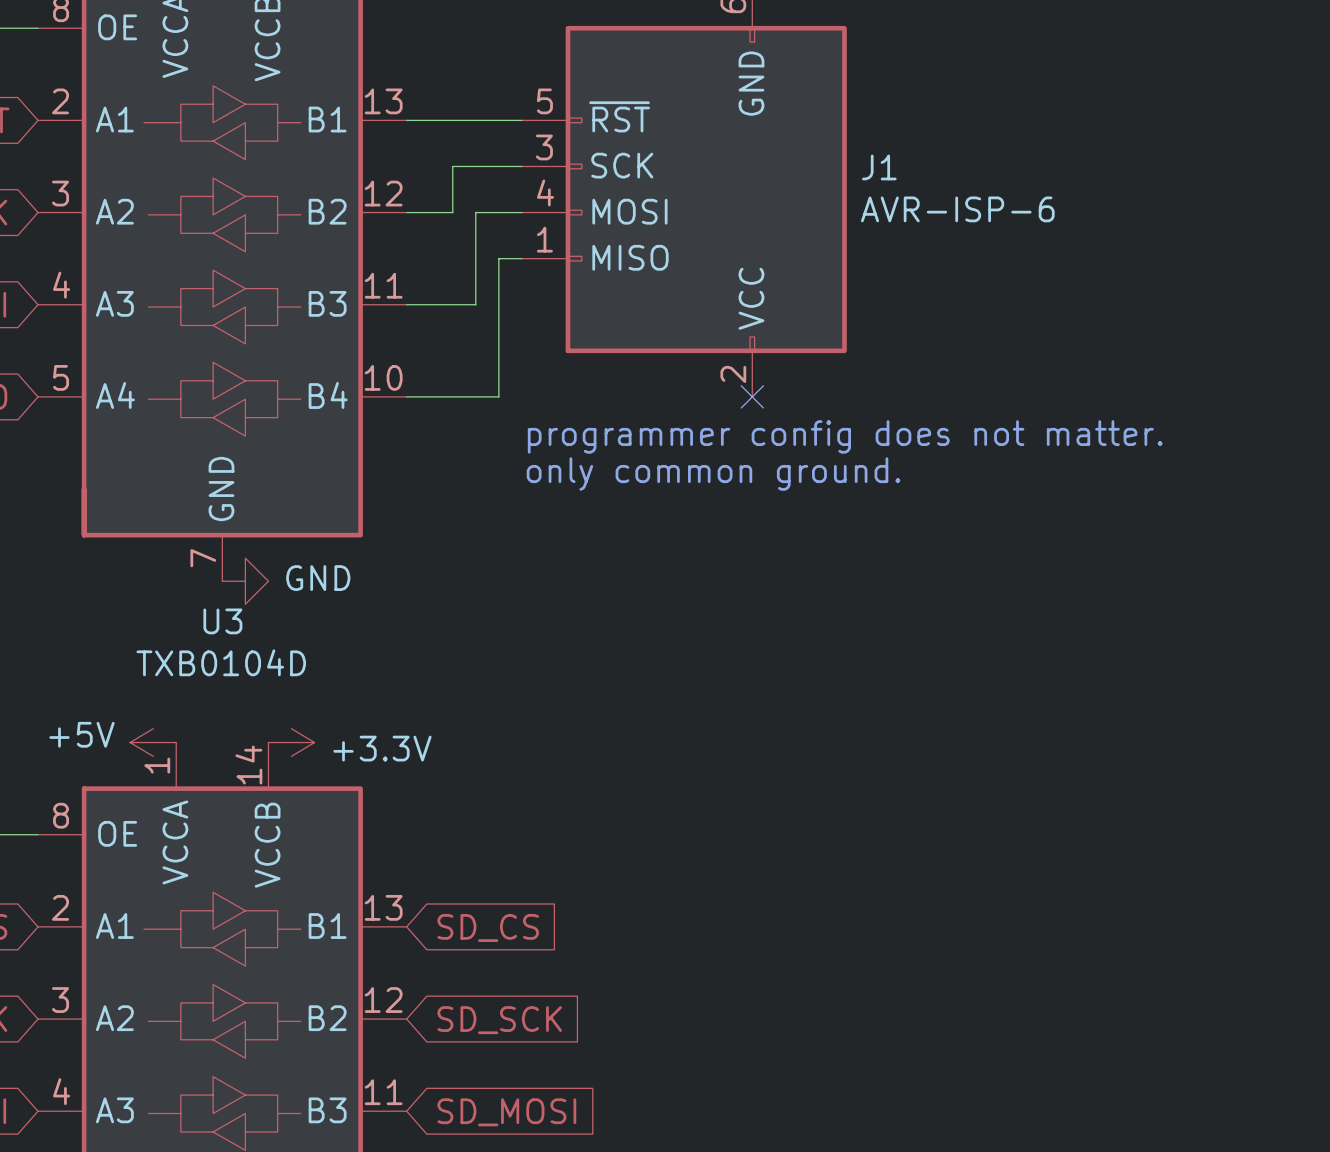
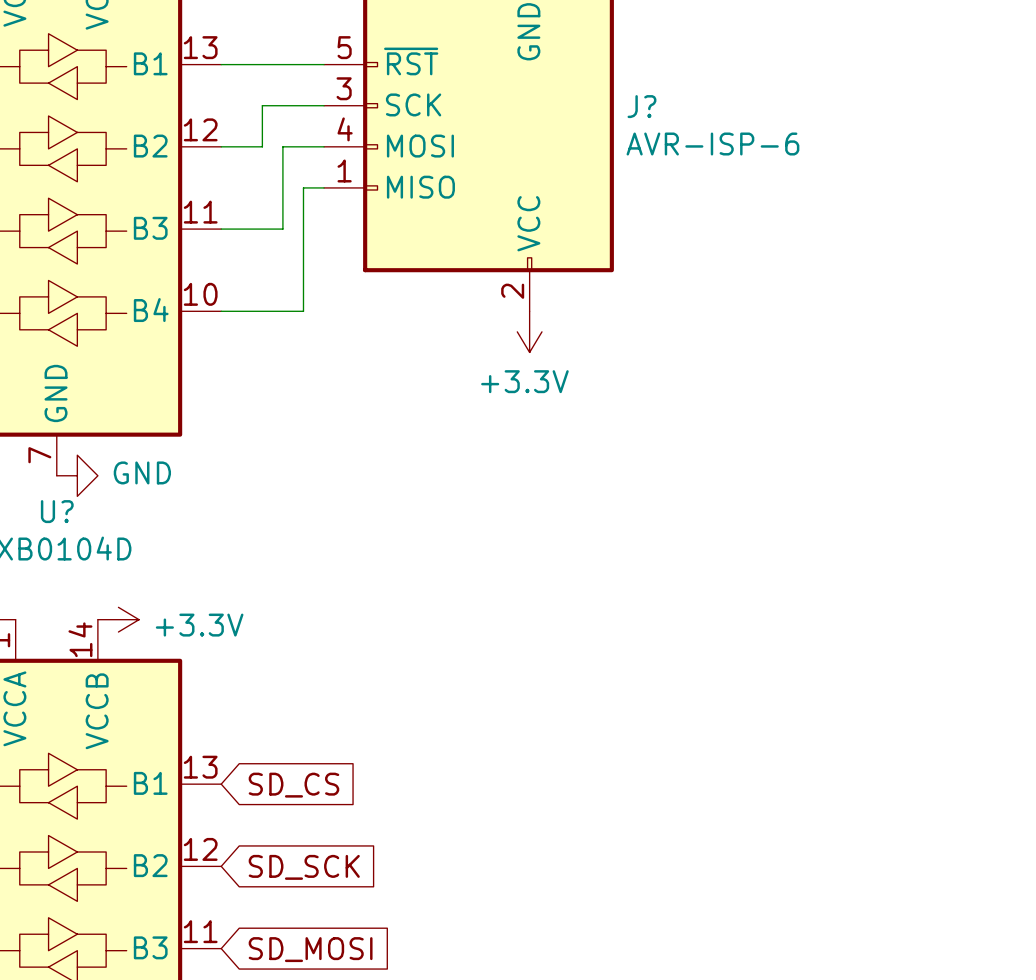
J1 name: J1 (879, 167) -> J? (641, 106)
no-connect mark: (752, 396) -> none
power symbol: none -> +3.3V (529, 331)
text: programmer config does not matter. (845, 436) -> none
text: only common ground. (713, 474) -> none
U3 name: U3 (222, 621) -> U? (57, 511)

